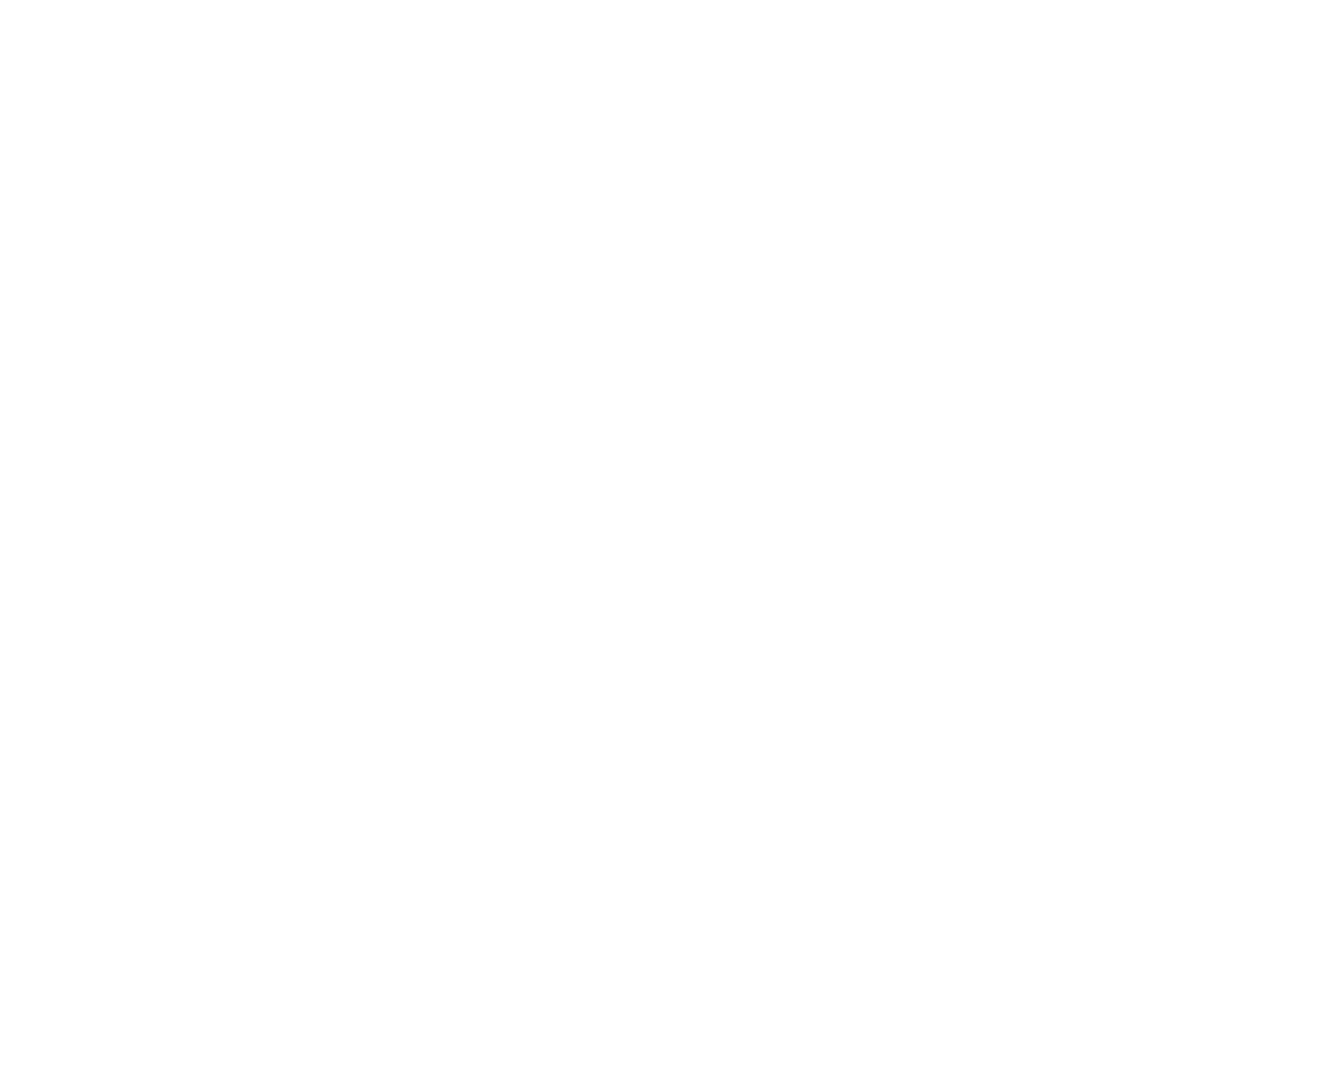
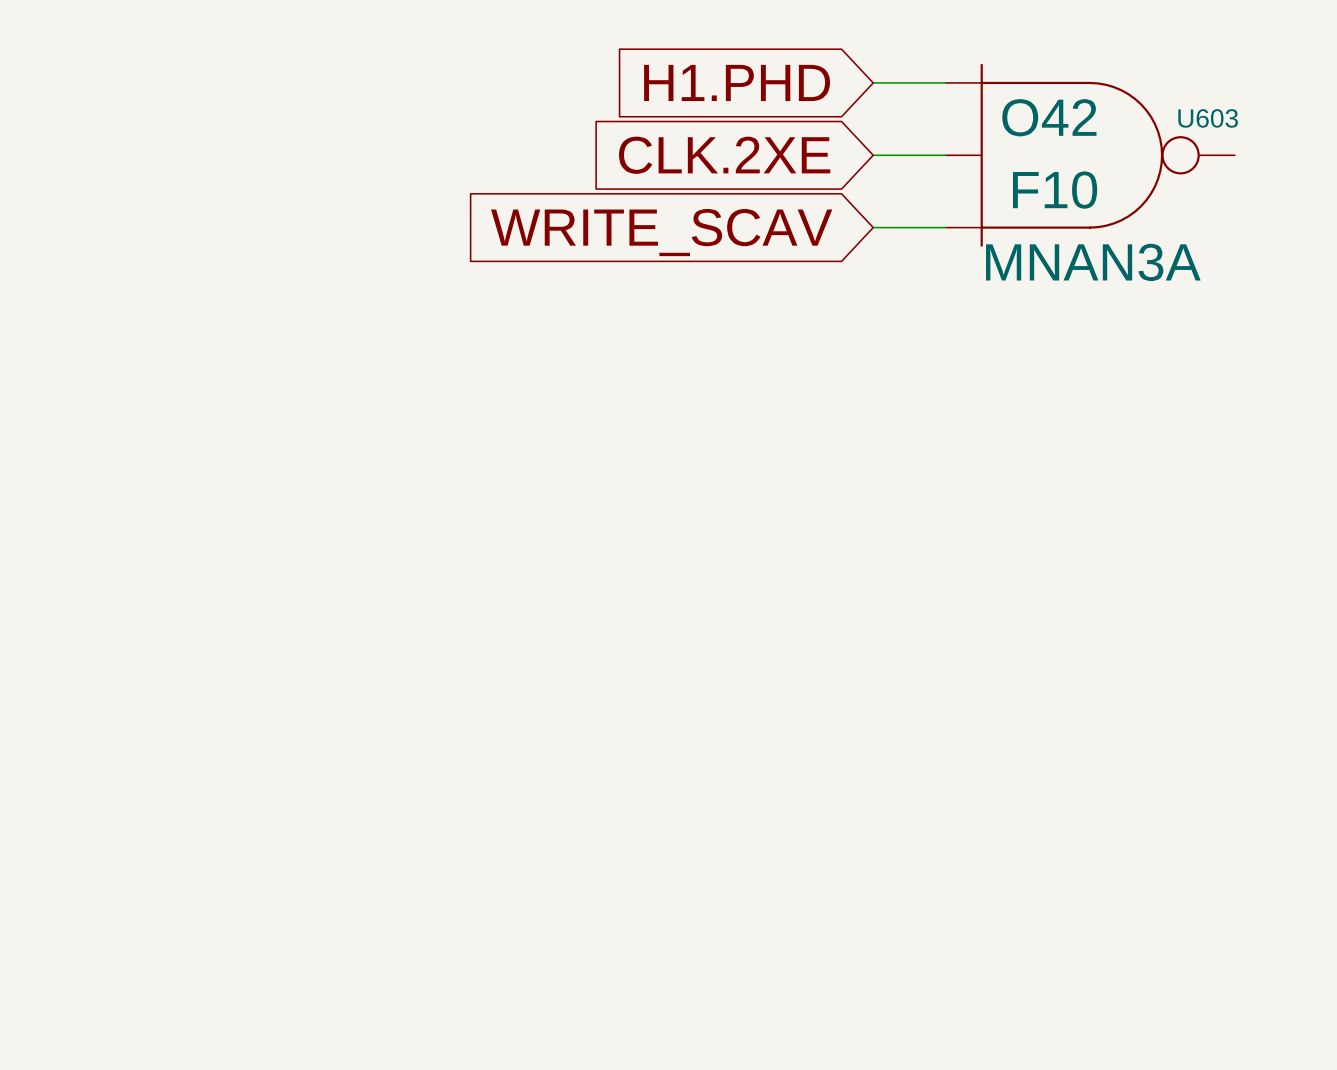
wire: none -> (873, 82) (945, 82)
global label: none -> H1.PHD (737, 82)
global label: none -> CLK.2XE (724, 155)
wire: none -> (873, 155) (945, 155)
U603: none -> F10 (1090, 155)
wire: none -> (873, 227) (945, 227)
global label: none -> WRITE_SCAV (661, 232)

